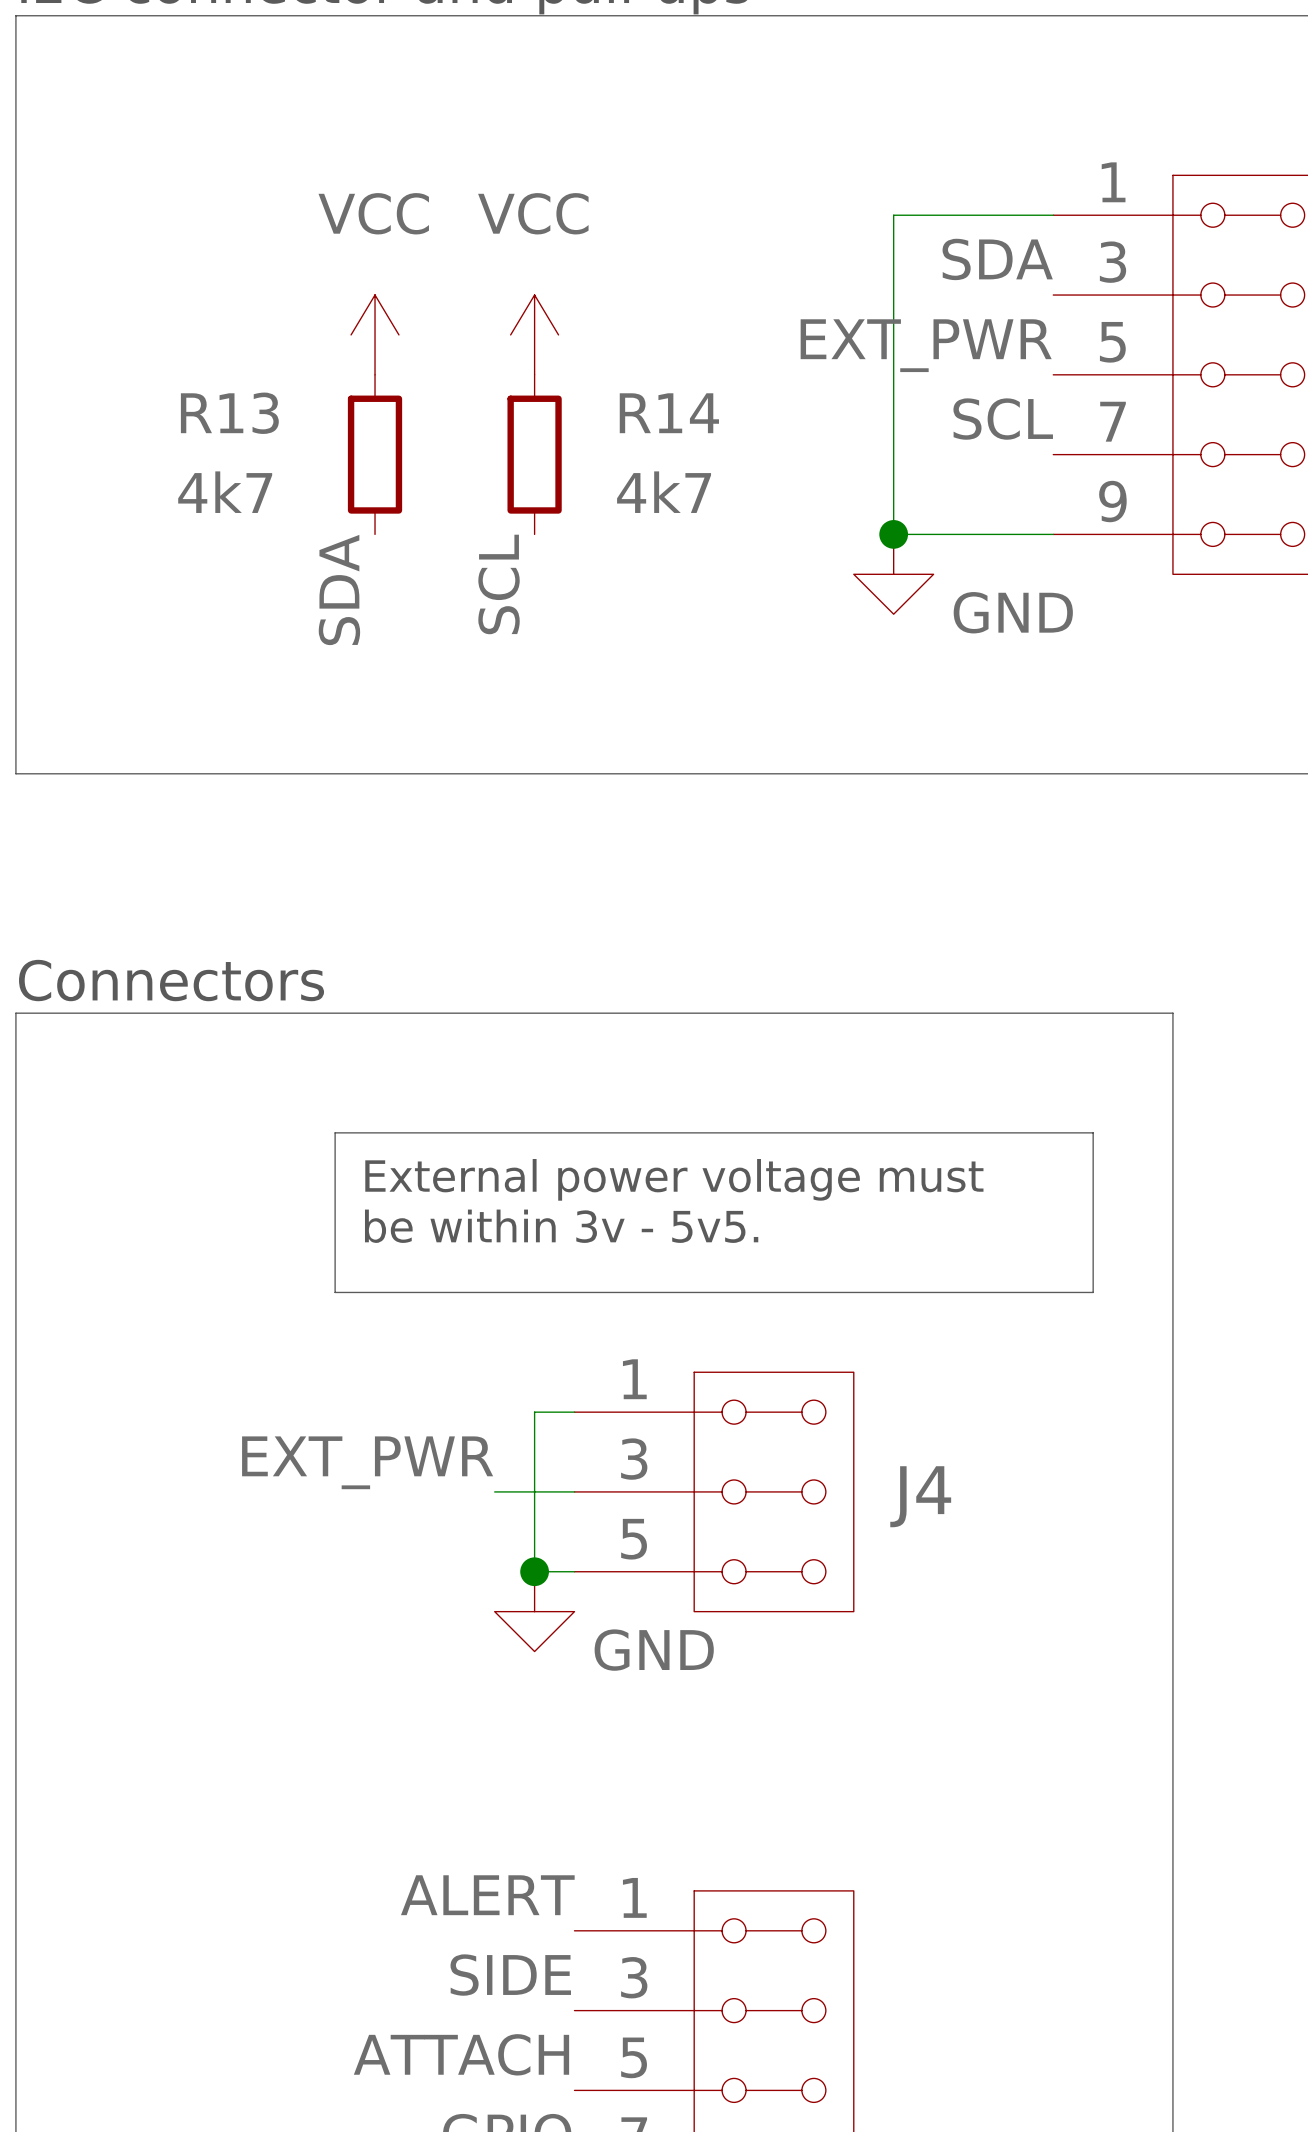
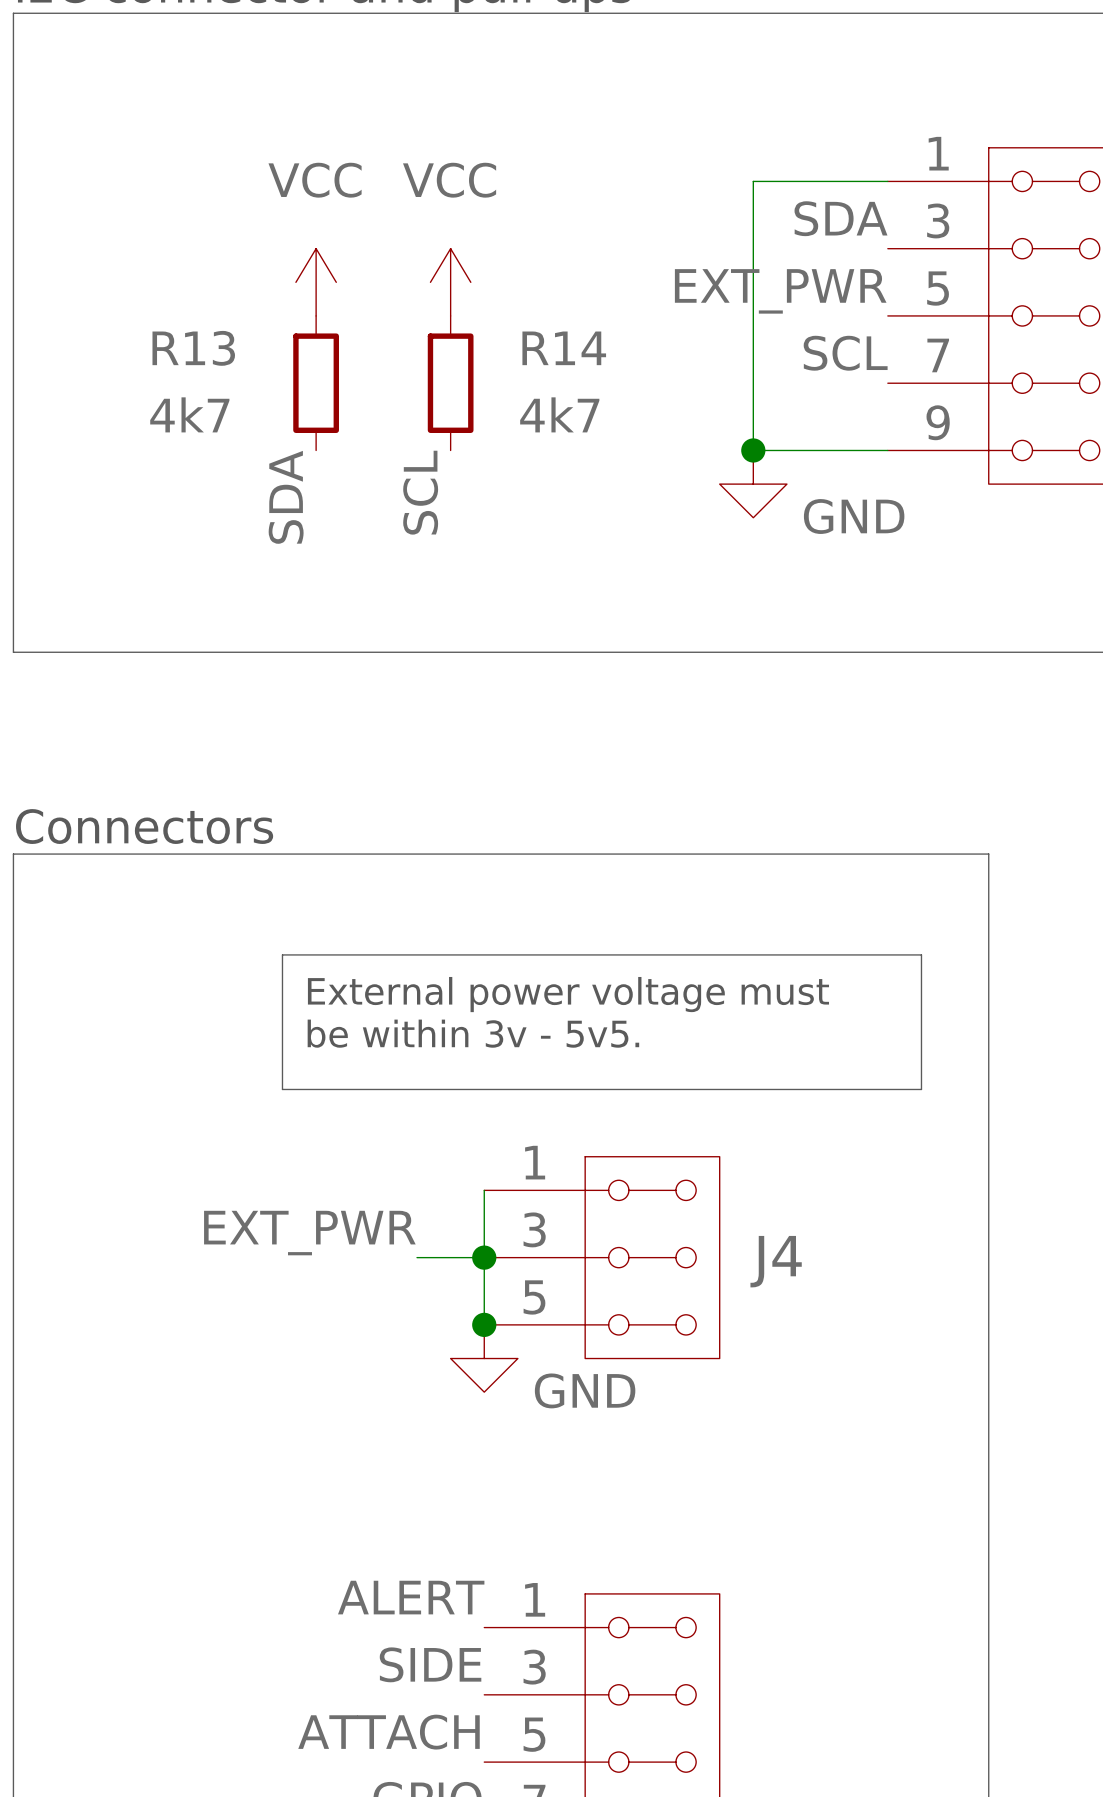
wire: (574, 1412) (534, 1412) (534, 1571) (574, 1571) -> (484, 1190) (484, 1324)
junction: none -> (484, 1257)
junction position: (534, 1571) -> (484, 1324)
power symbol position: GND (534, 1611) -> GND (484, 1358)

